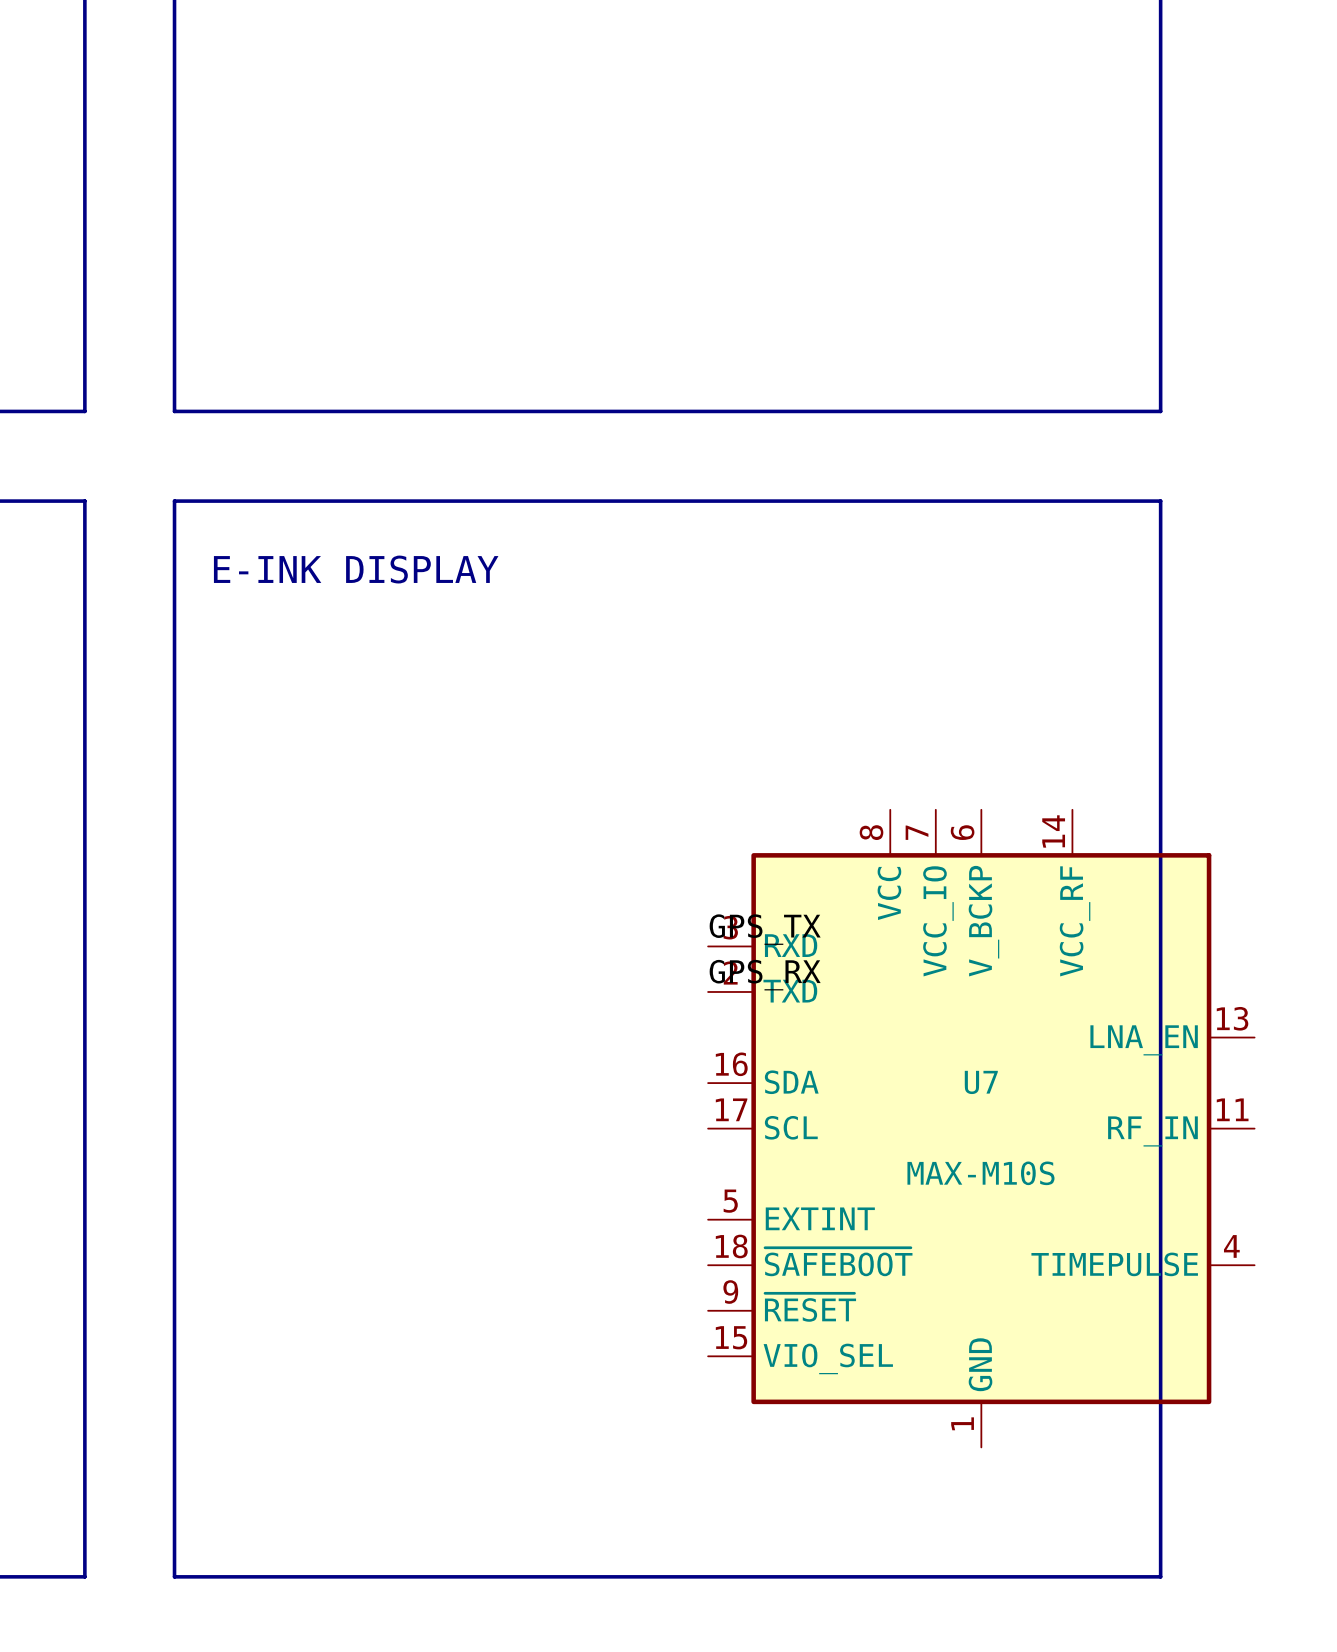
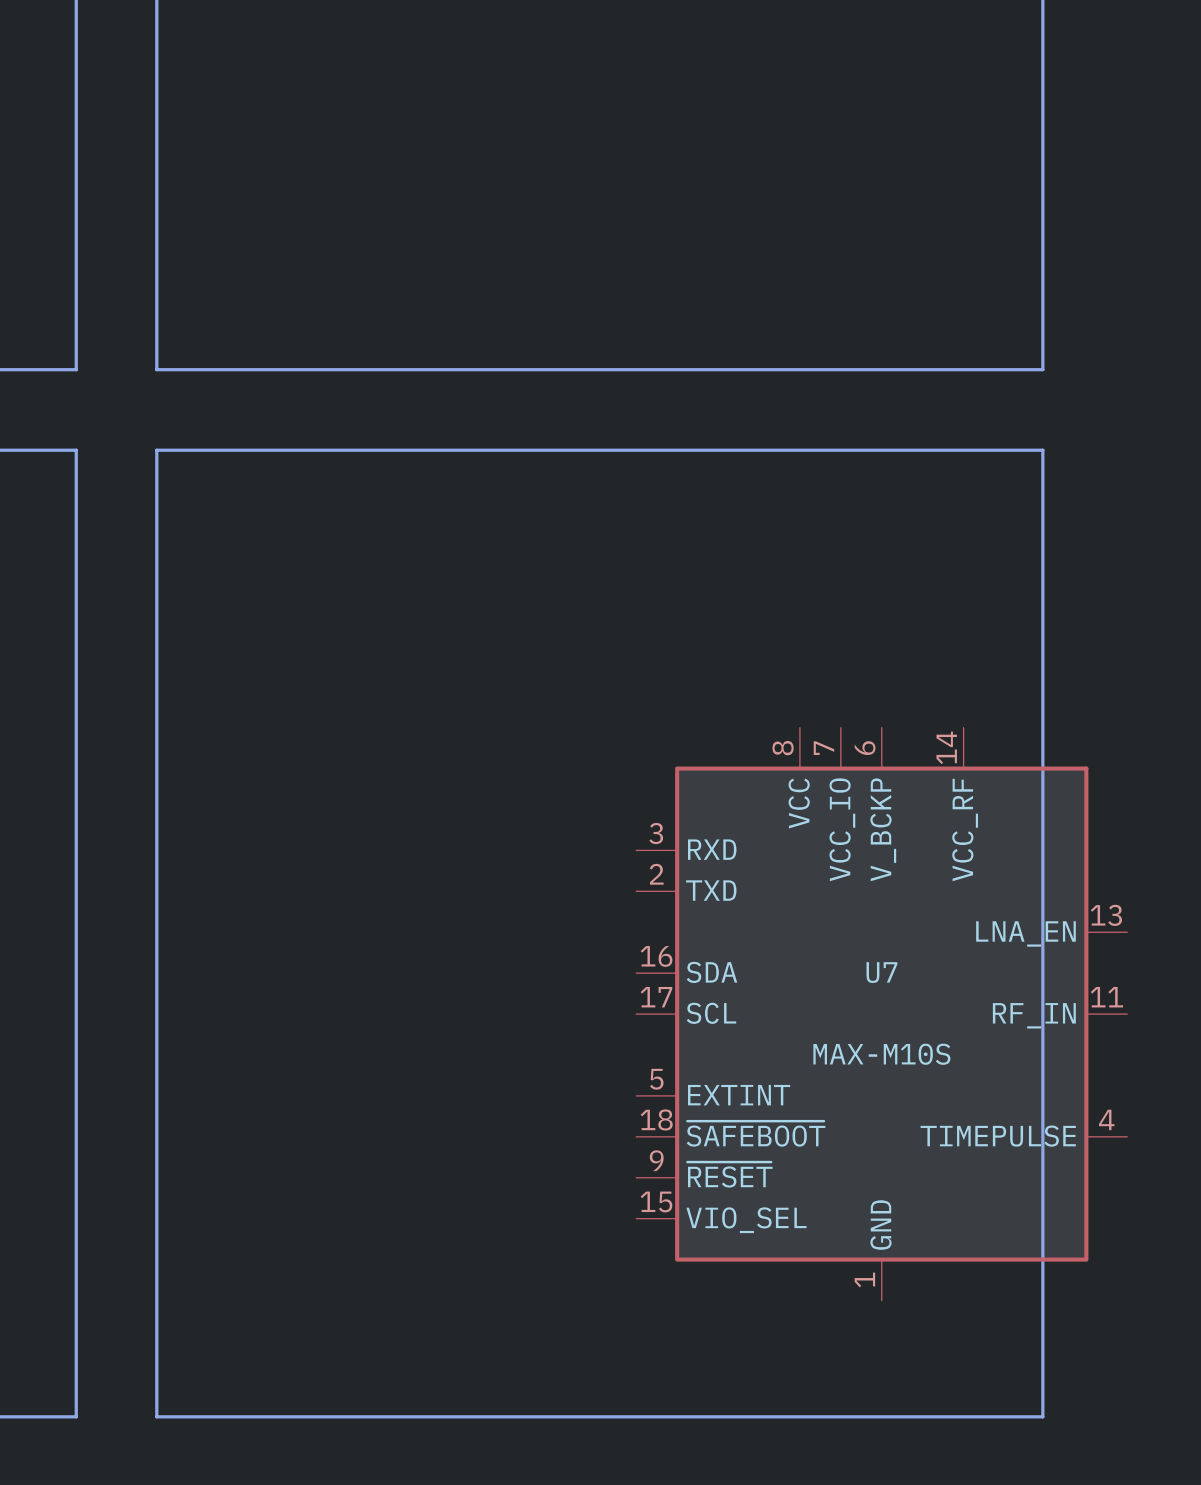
text: E-INK DISPLAY (356, 569) -> none
label: GPS_TX (765, 929) -> none
label: GPS_RX (765, 975) -> none

